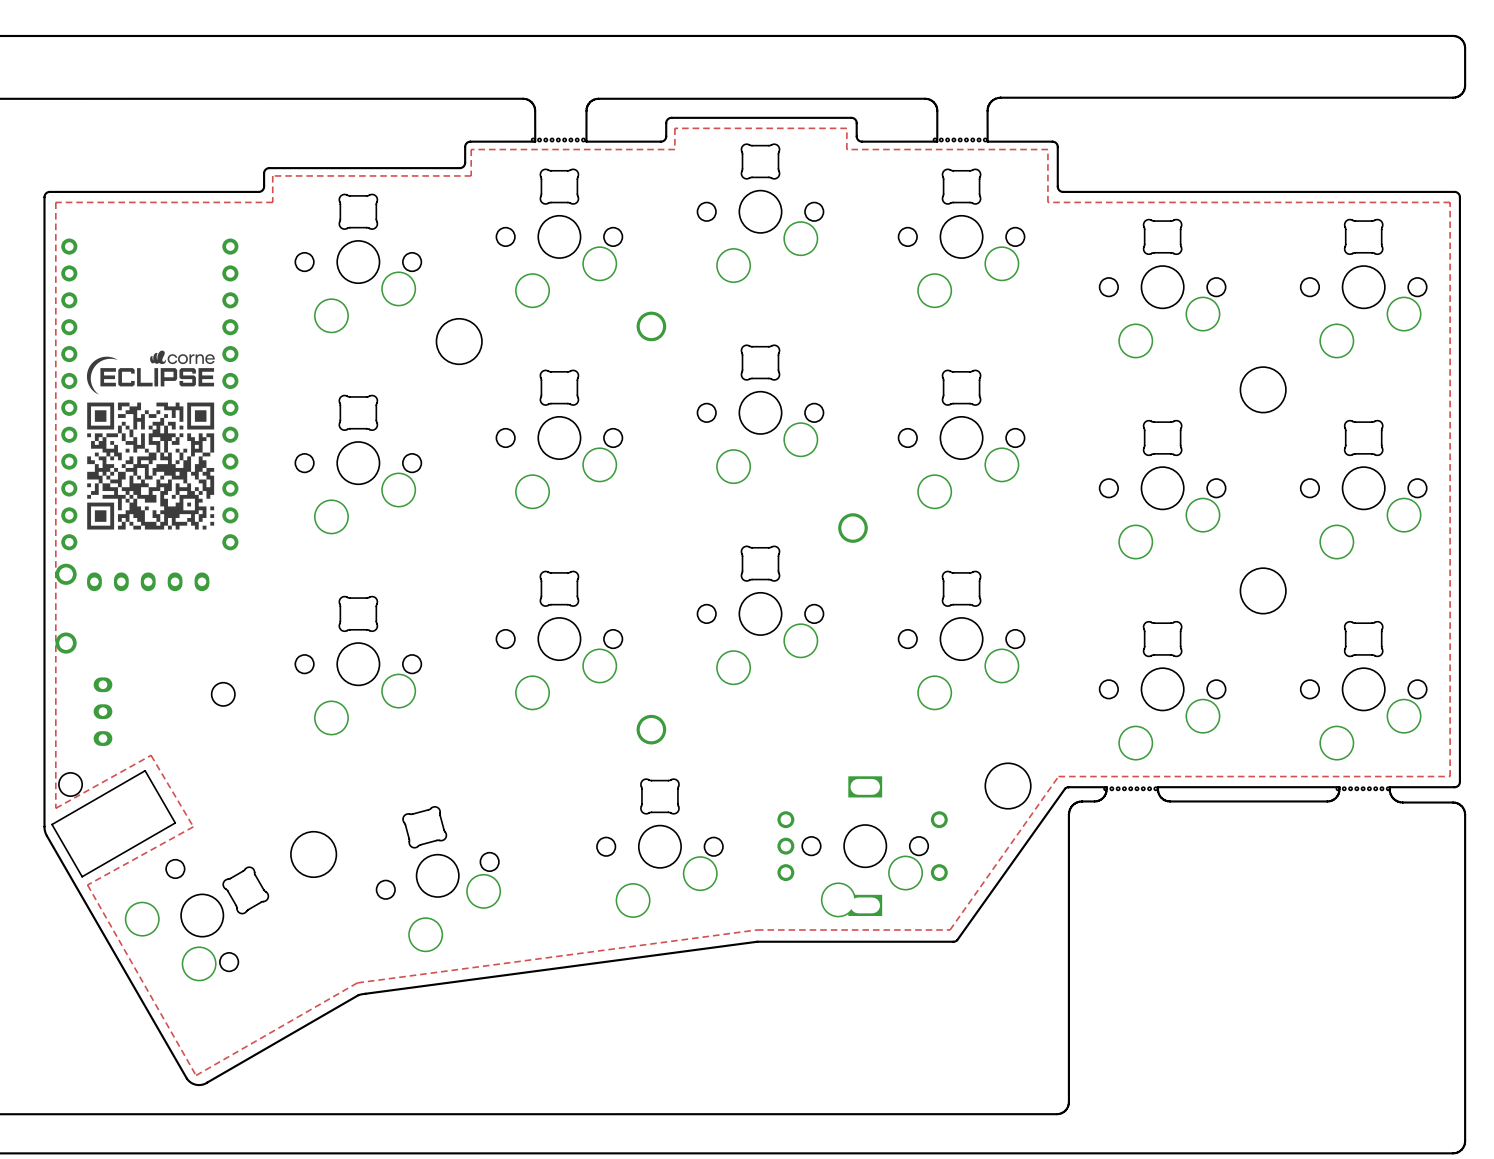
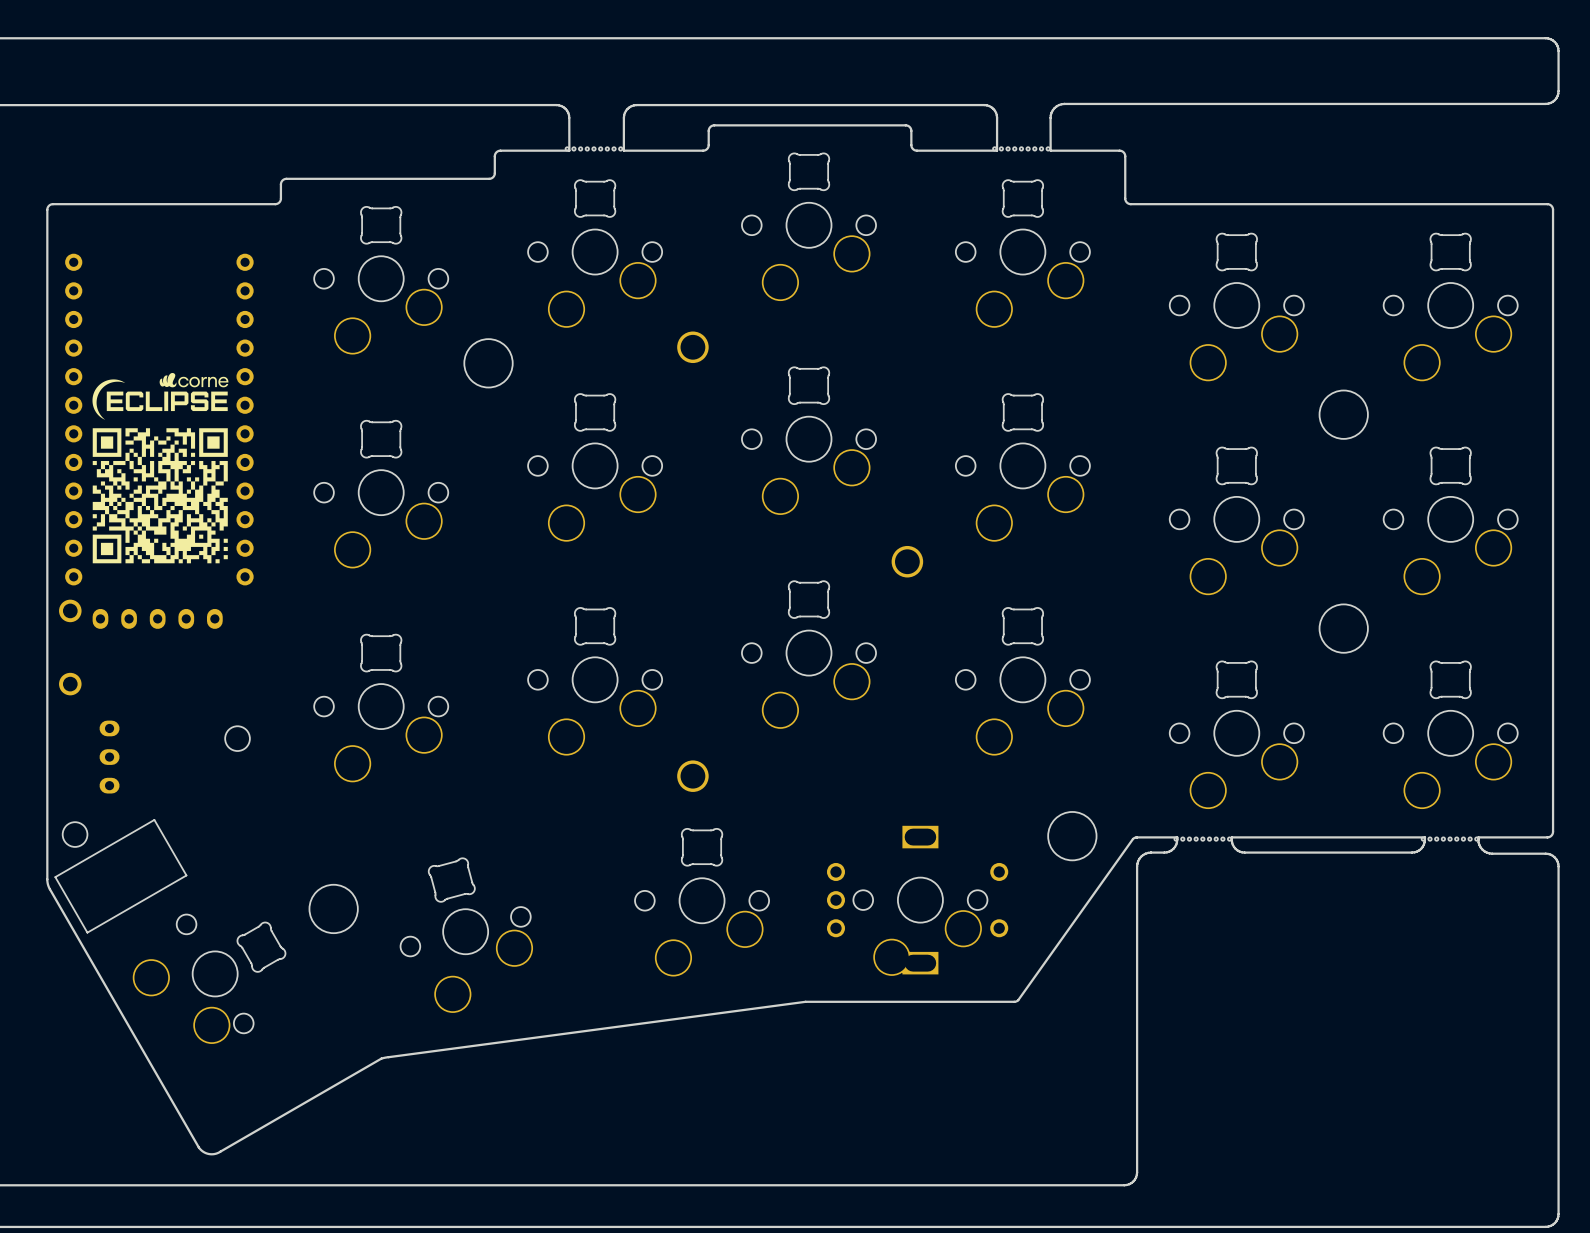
zone outline: (674, 128) (846, 128) (846, 149) (1047, 149) (1047, 202) (1450, 202) (1450, 776) (1058, 776) (950, 929) (756, 929) (357, 982) (196, 1075) (87, 885) (193, 826) (151, 755) (55, 808) (55, 202) (272, 202) (272, 175) (471, 175) (471, 149) (674, 149) (674, 128) -> none

